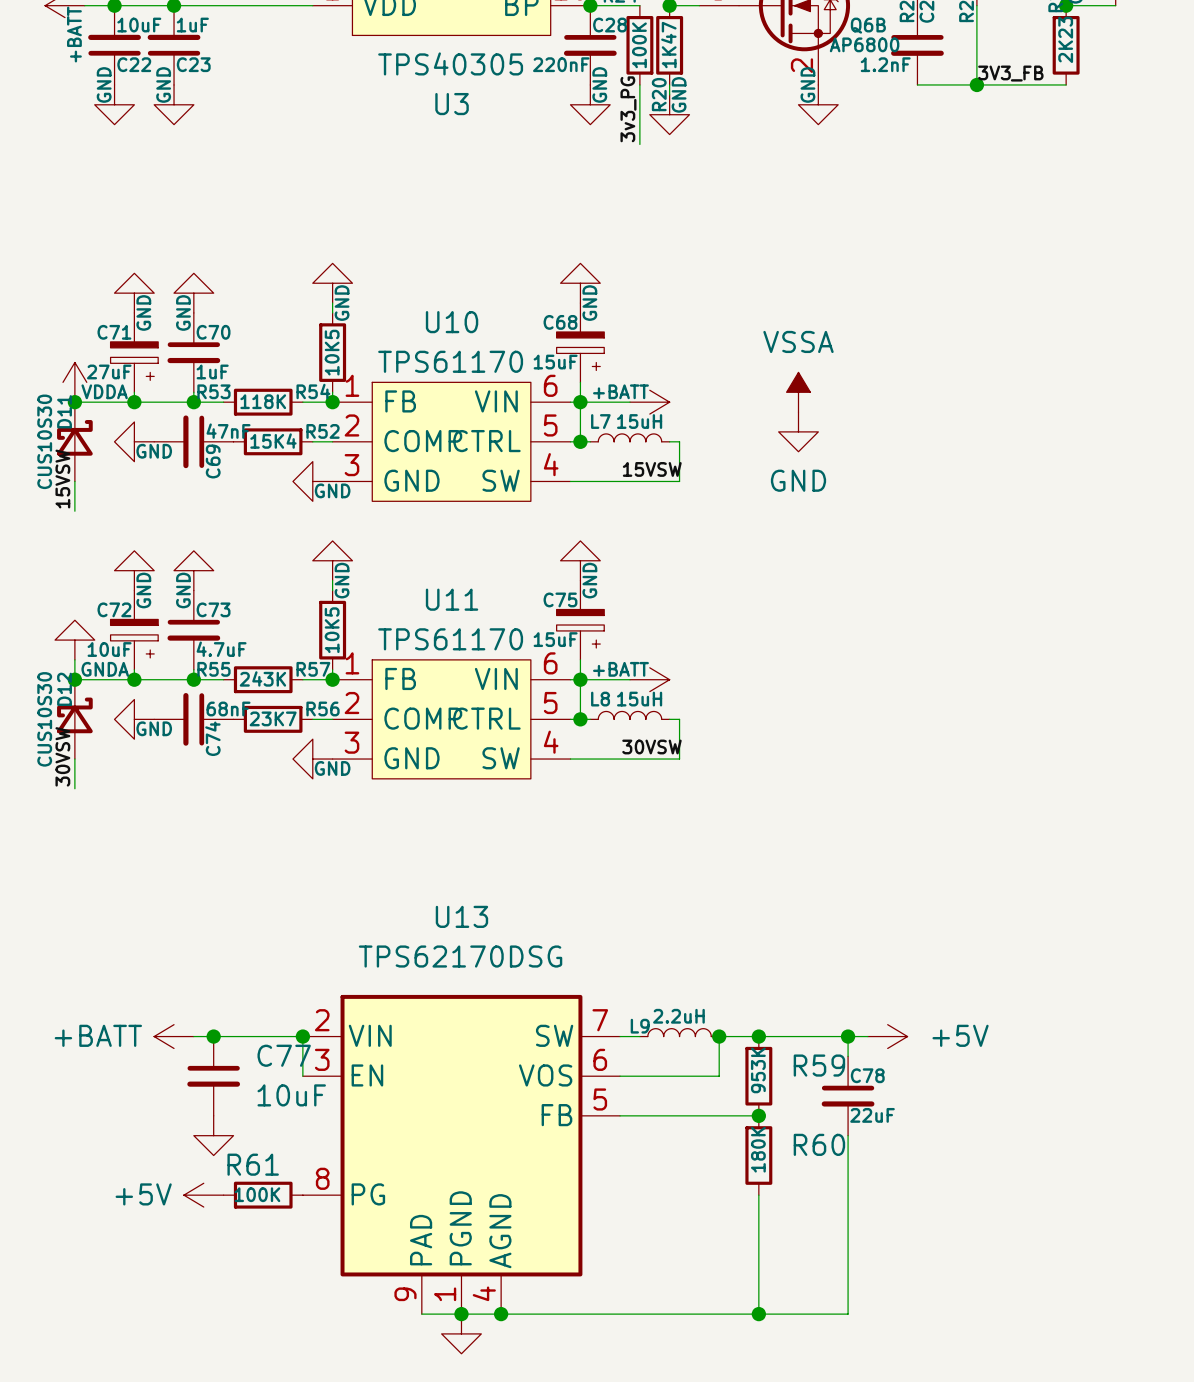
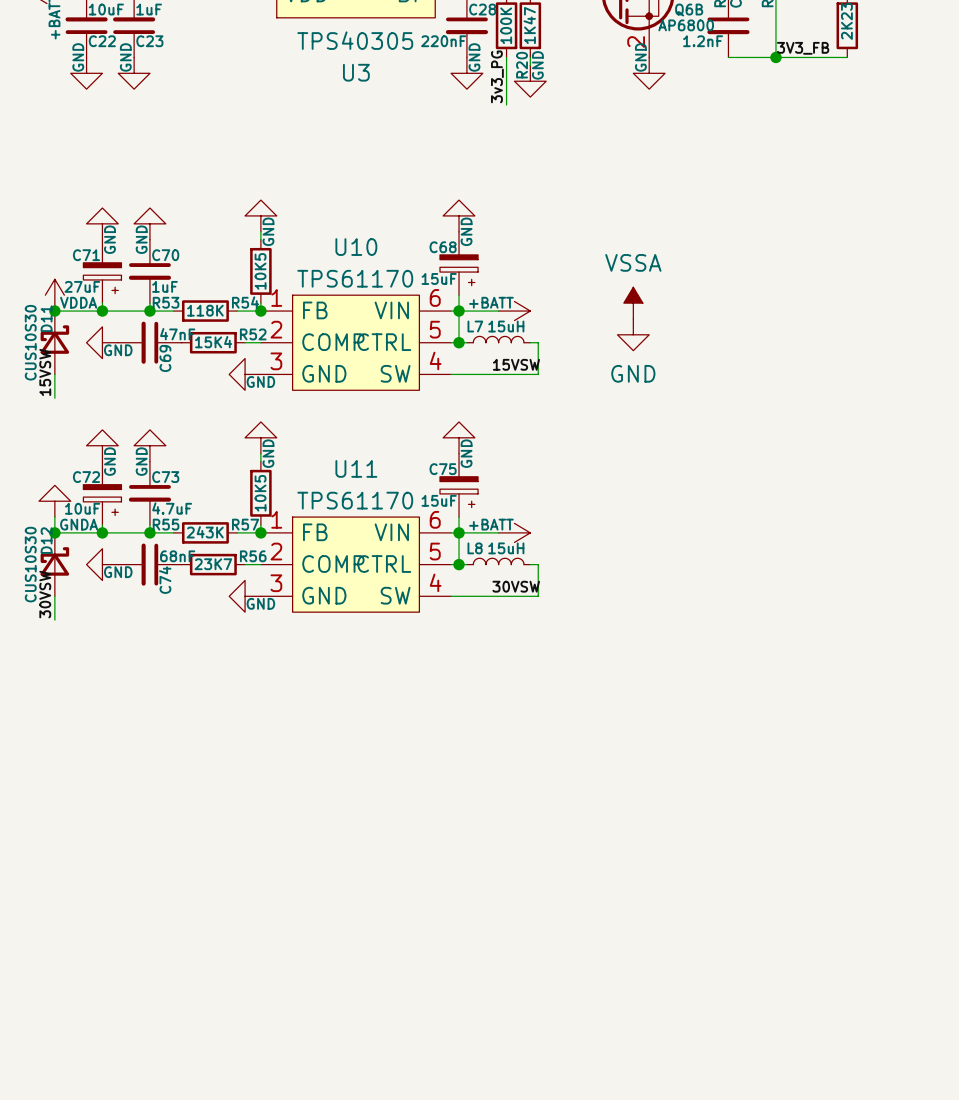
L9: 2.2uH (679, 1032) -> none
power symbol: +BATT (174, 1036) -> none
wire: (193, 1036) (302, 1036) (302, 1076) -> none
junction: (213, 1036) -> none
junction: (302, 1036) -> none
wire: (620, 1036) (639, 1036) -> none
junction: (719, 1036) -> none
junction: (758, 1036) -> none
wire: (848, 1036) (848, 1056) -> none
junction: (848, 1036) -> none
wire: (867, 1036) (719, 1036) (719, 1076) (620, 1076) -> none
power symbol: +5V (887, 1036) -> none
C77: 10uF (213, 1076) -> none
R59: 953K (758, 1076) -> none
C78: 22uF (848, 1096) -> none
wire: (620, 1115) (758, 1115) -> none
junction: (758, 1115) -> none
power symbol: (213, 1135) -> none
wire: (848, 1135) (848, 1314) (421, 1314) -> none
U13: TPS62170DSG (461, 1154) -> none
R60: 180K (758, 1155) -> none
power symbol: +5V (203, 1195) -> none
R61: 100K (263, 1195) -> none
wire: (758, 1195) (758, 1314) -> none
junction: (461, 1314) -> none
junction: (501, 1314) -> none
junction: (758, 1314) -> none
power symbol: (461, 1333) -> none

